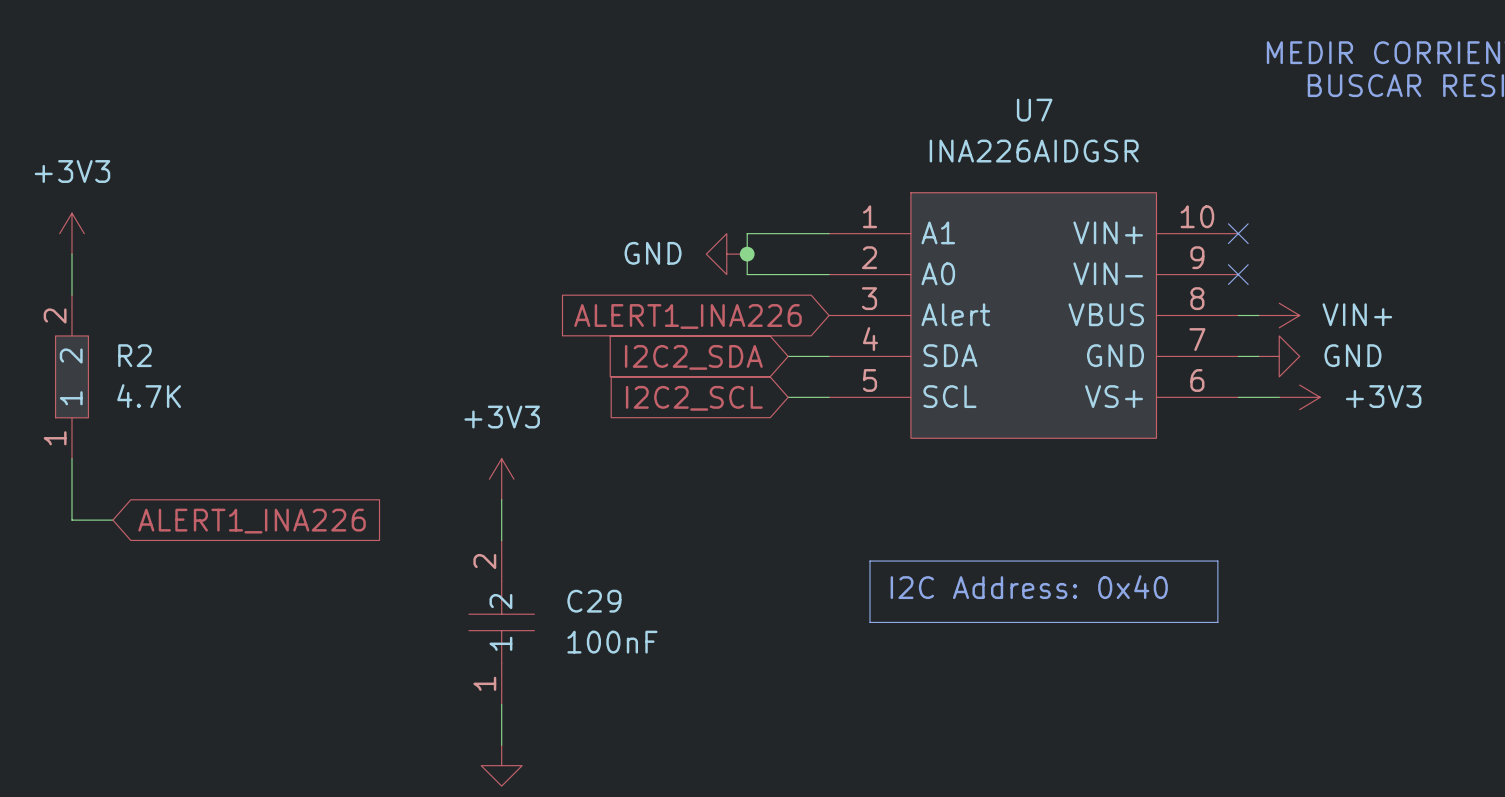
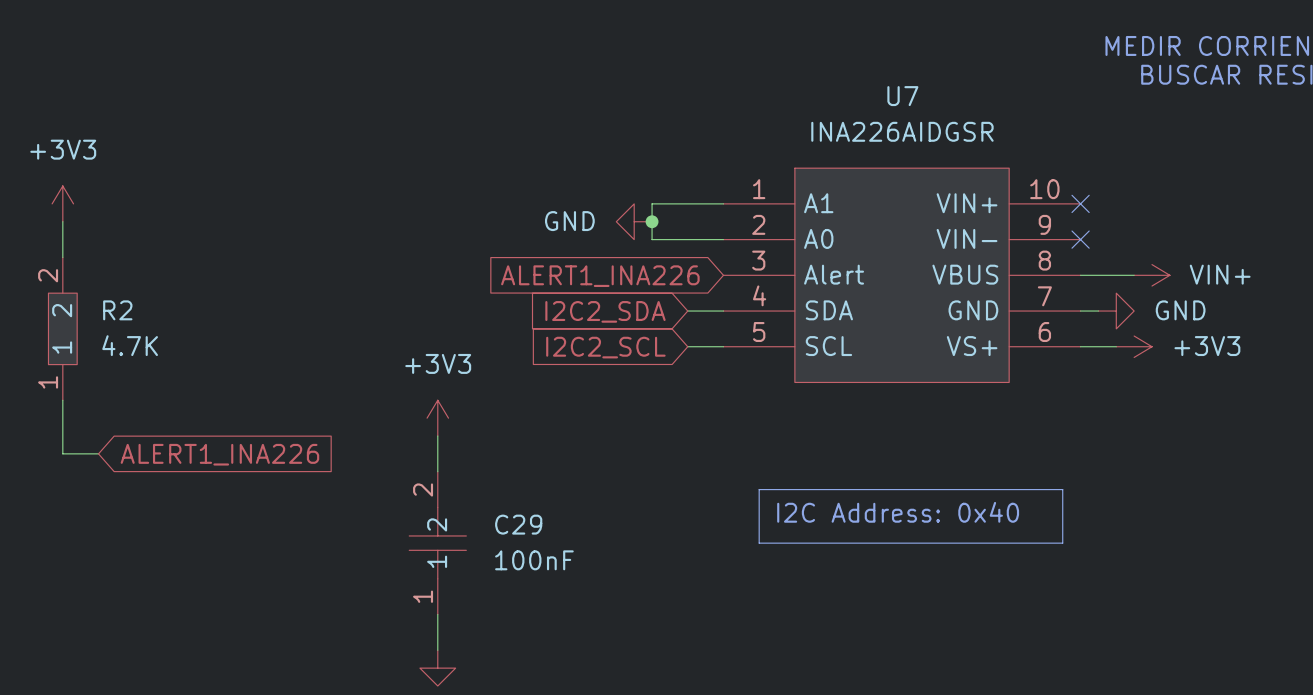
power symbol position: VIN+ (1279, 315) -> VIN+ (1152, 275)

